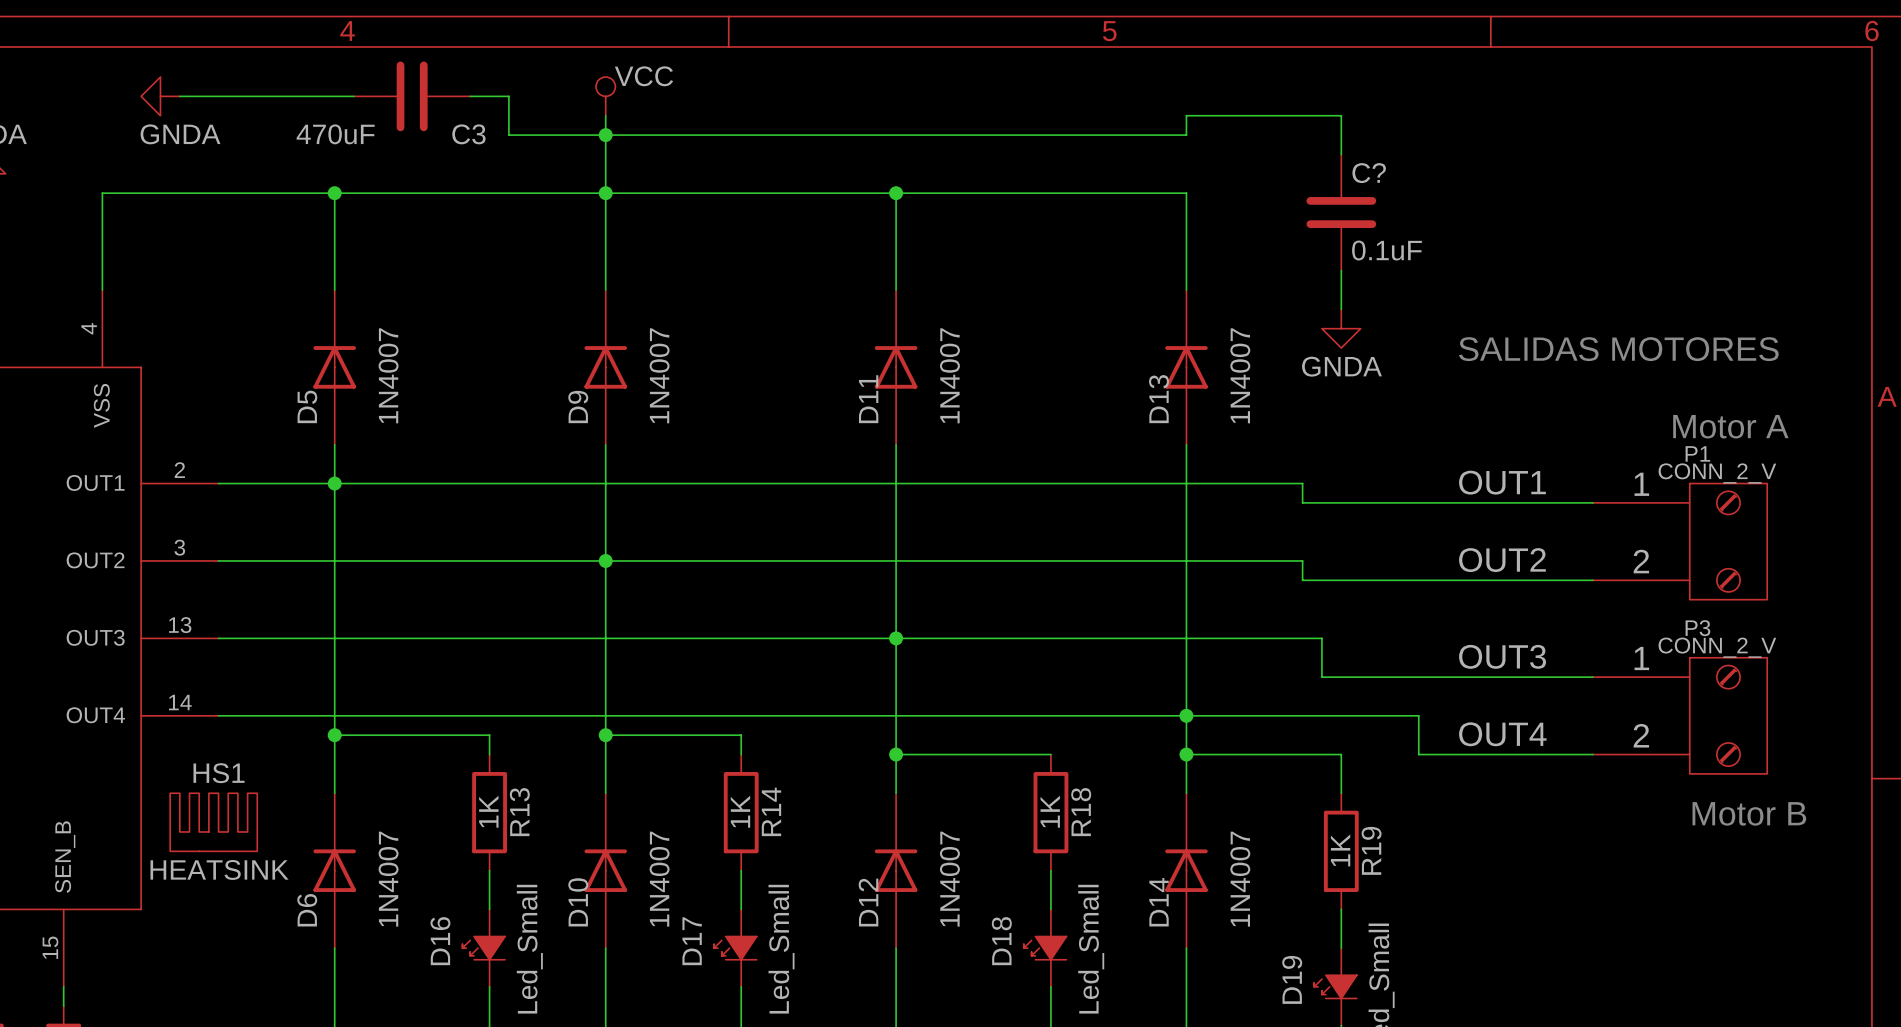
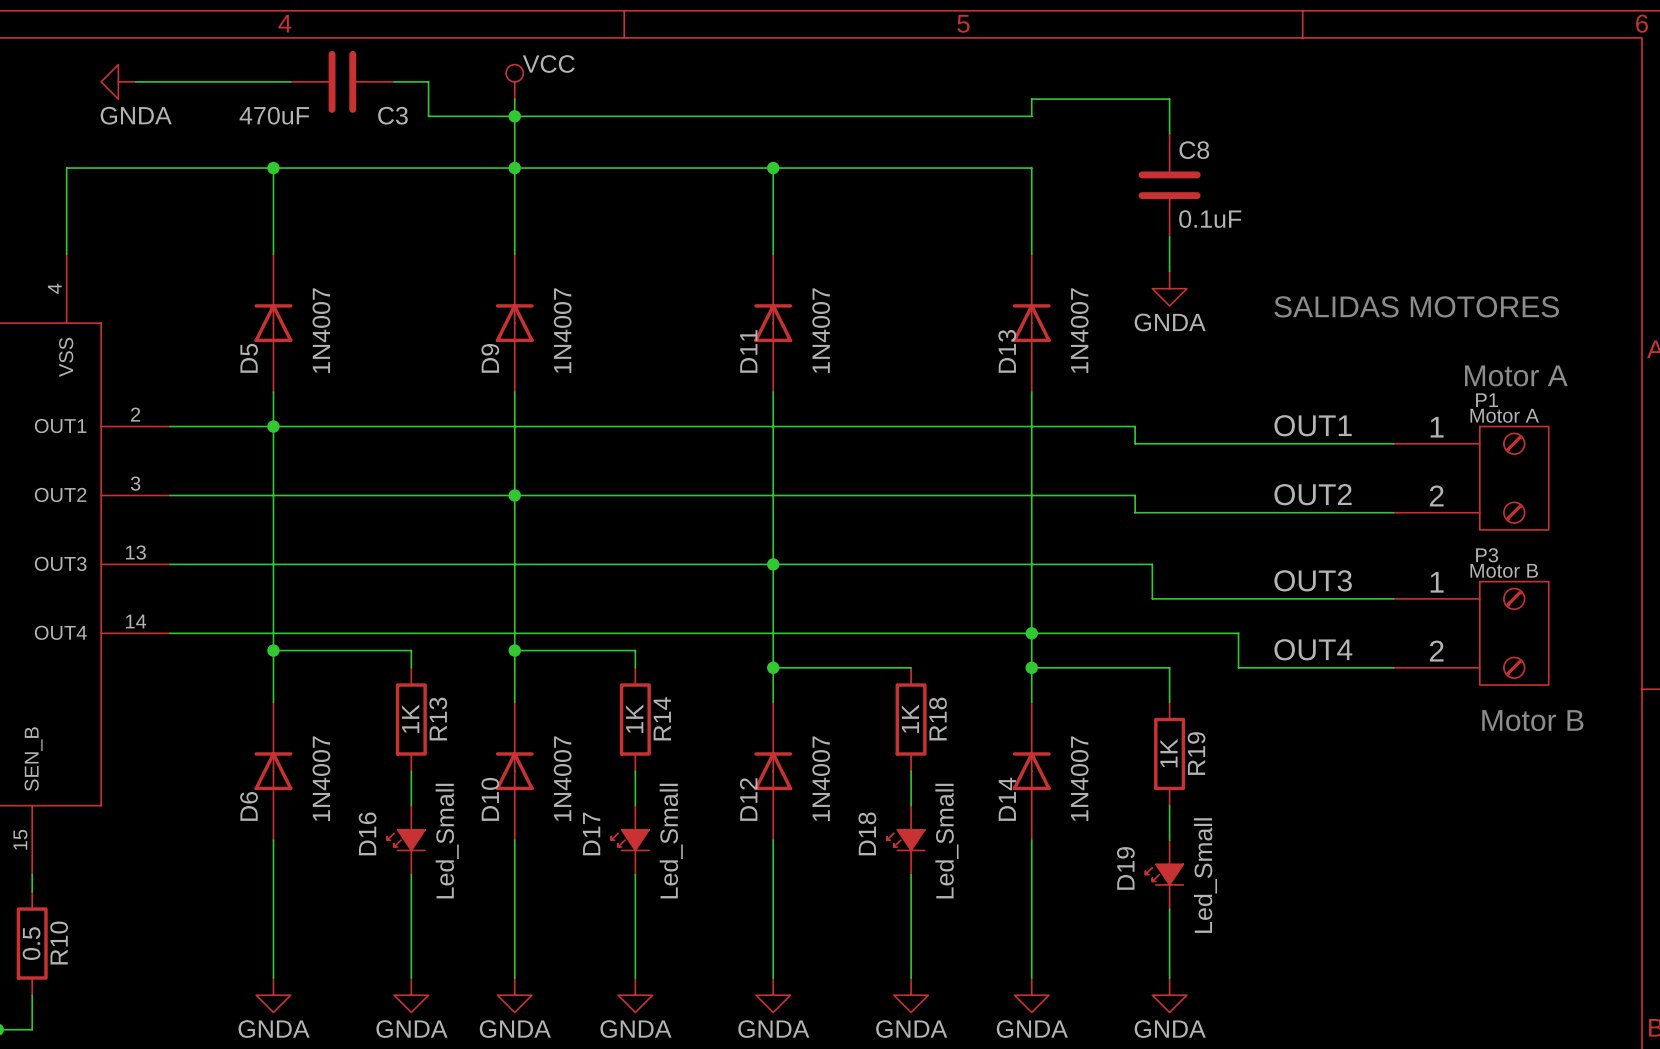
C? name: C? (1369, 173) -> C8 (1194, 150)
P1 value: CONN_2_V (1717, 473) -> Motor A (1504, 415)
P3 value: CONN_2_V (1717, 647) -> Motor B (1504, 570)
HS1: HEATSINK (213, 822) -> none

